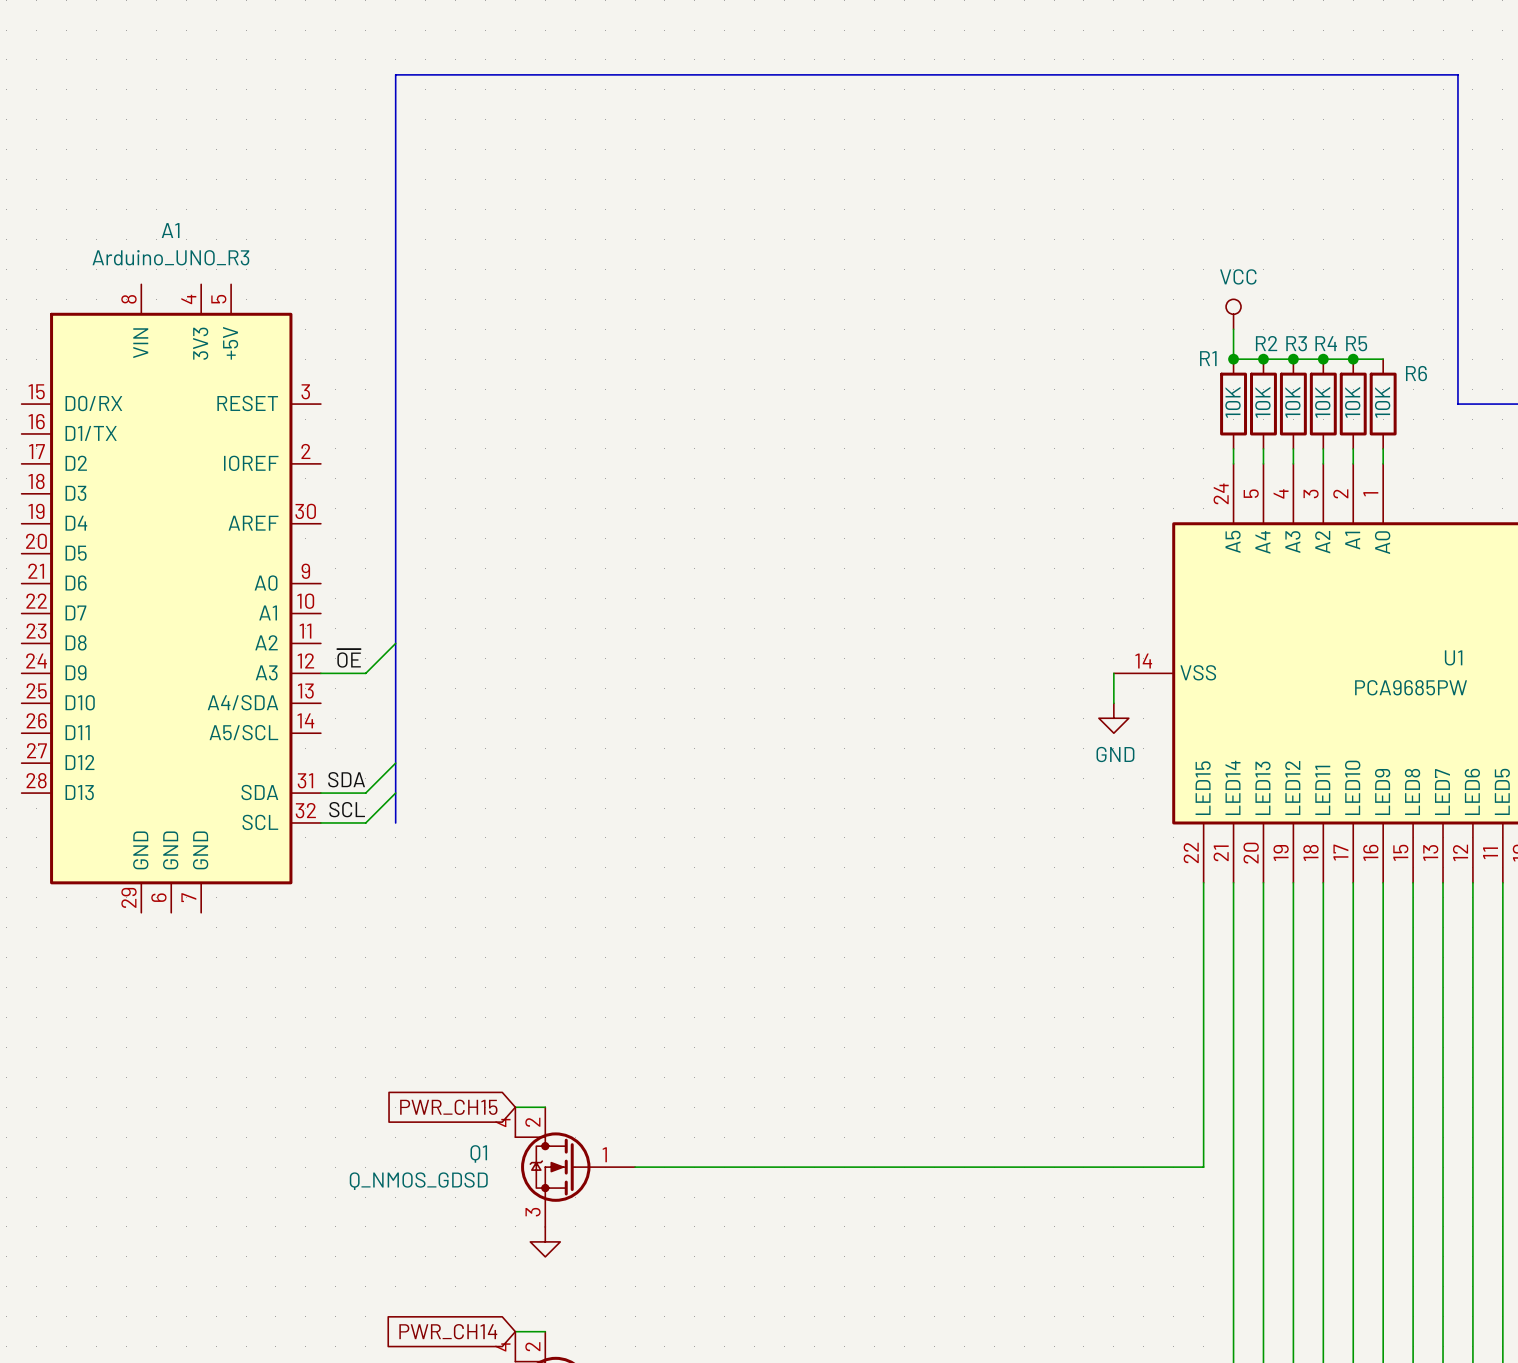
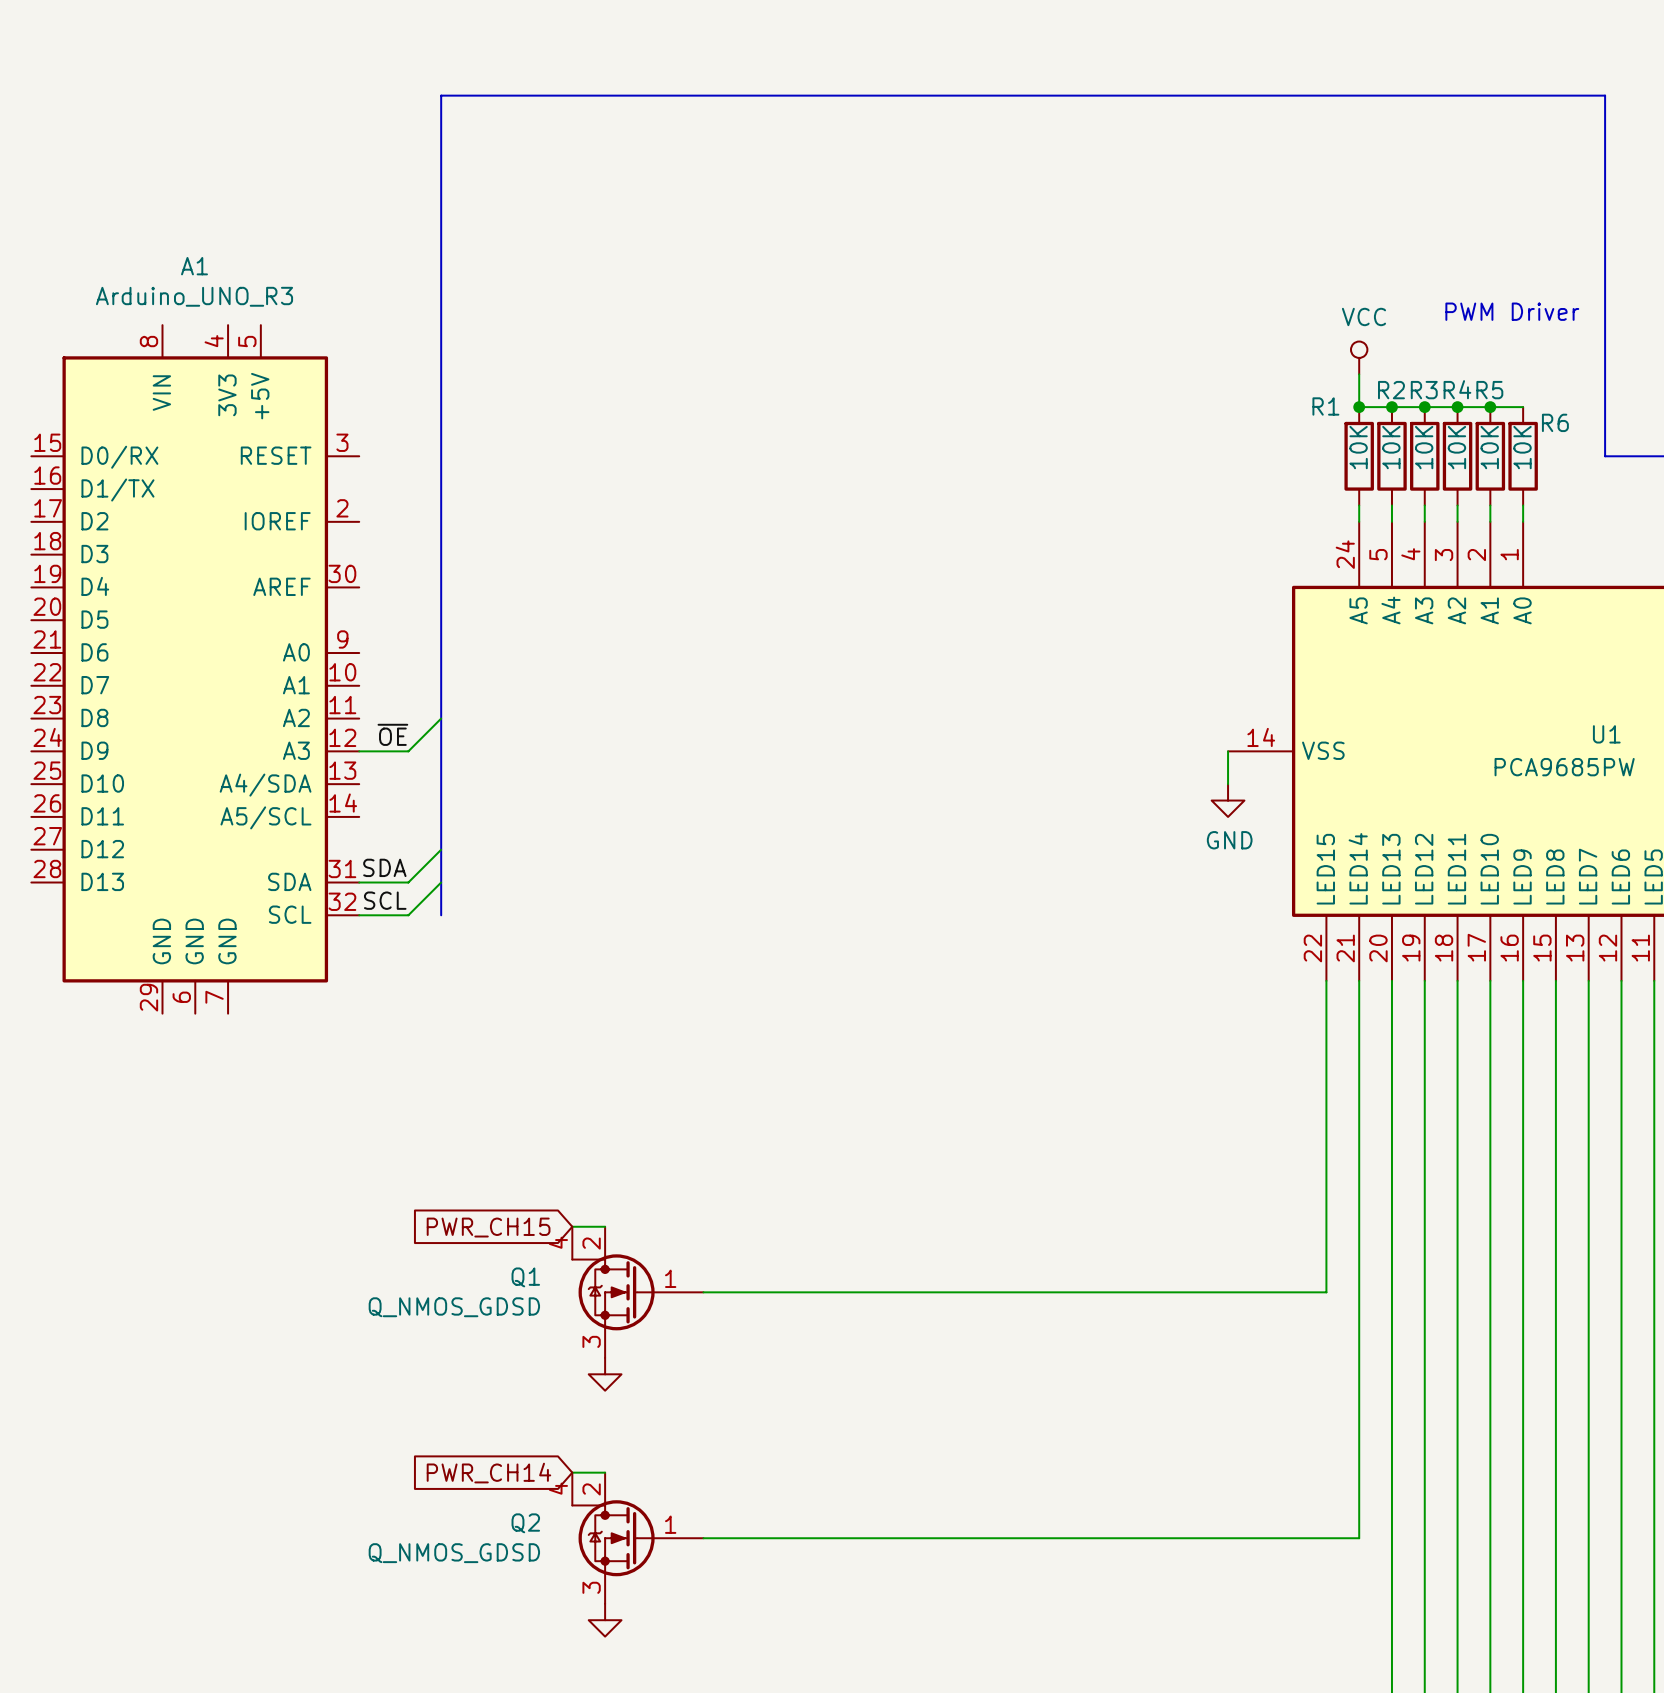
text: none -> PWM Driver (1512, 311)

